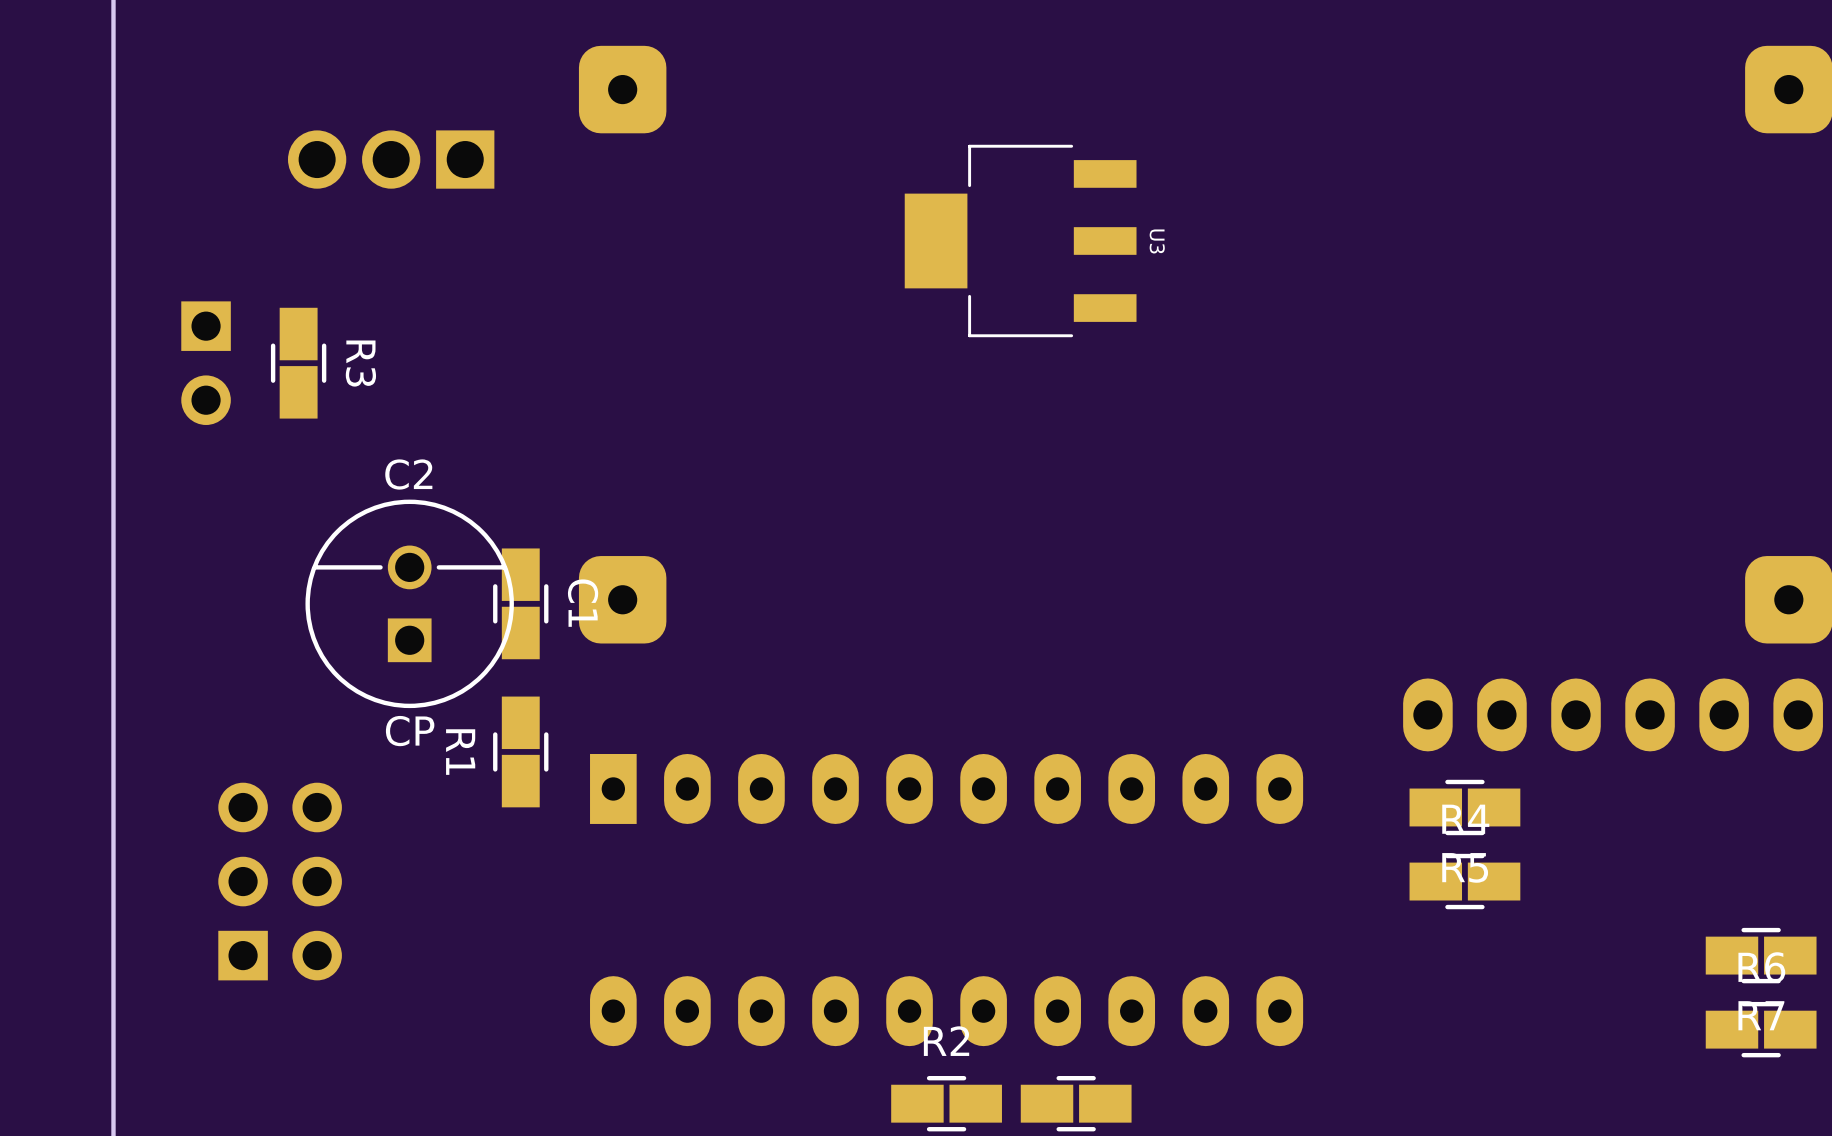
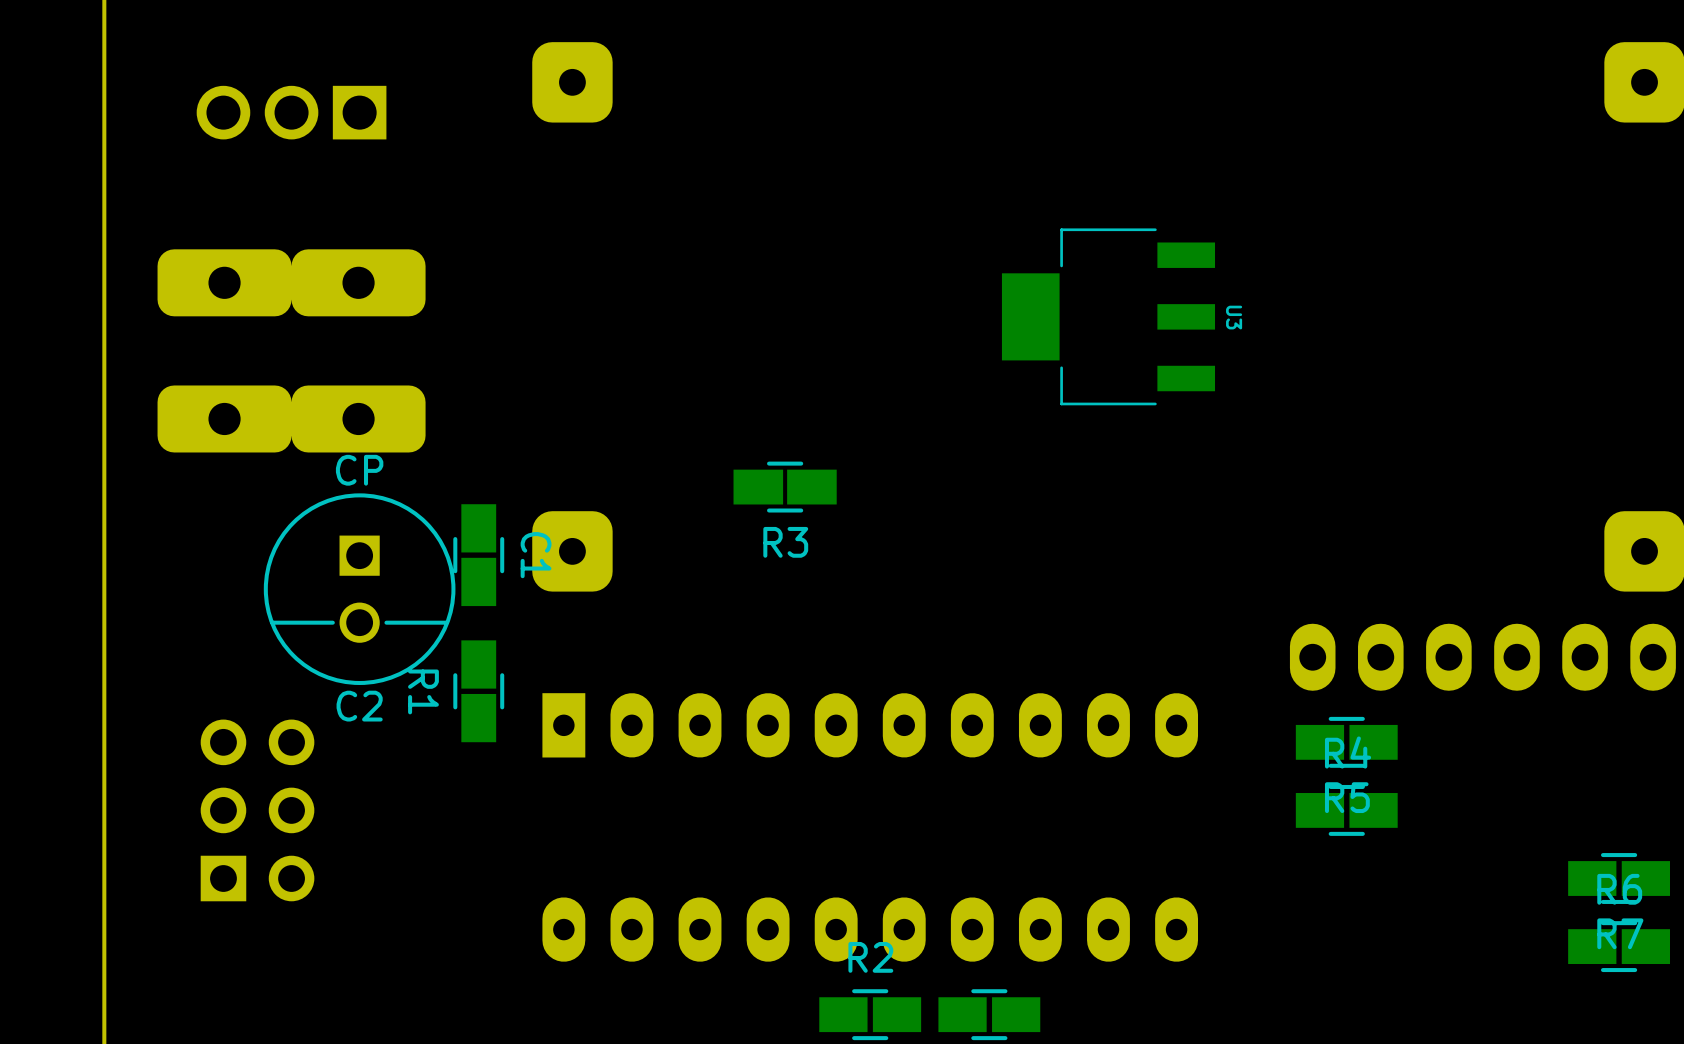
part position: (391, 159) -> (291, 112)
U3 position: (1020, 240) -> (1108, 316)
R3 footprint: [270, 307, 327, 419] -> [733, 461, 837, 513]
part: none -> (291, 282)
part: (206, 363) -> none
R3 name position: R3 (360, 363) -> R3 (785, 542)
part: none -> (291, 418)
C2 rotation: 0° (409, 603) -> 180° (359, 589)

